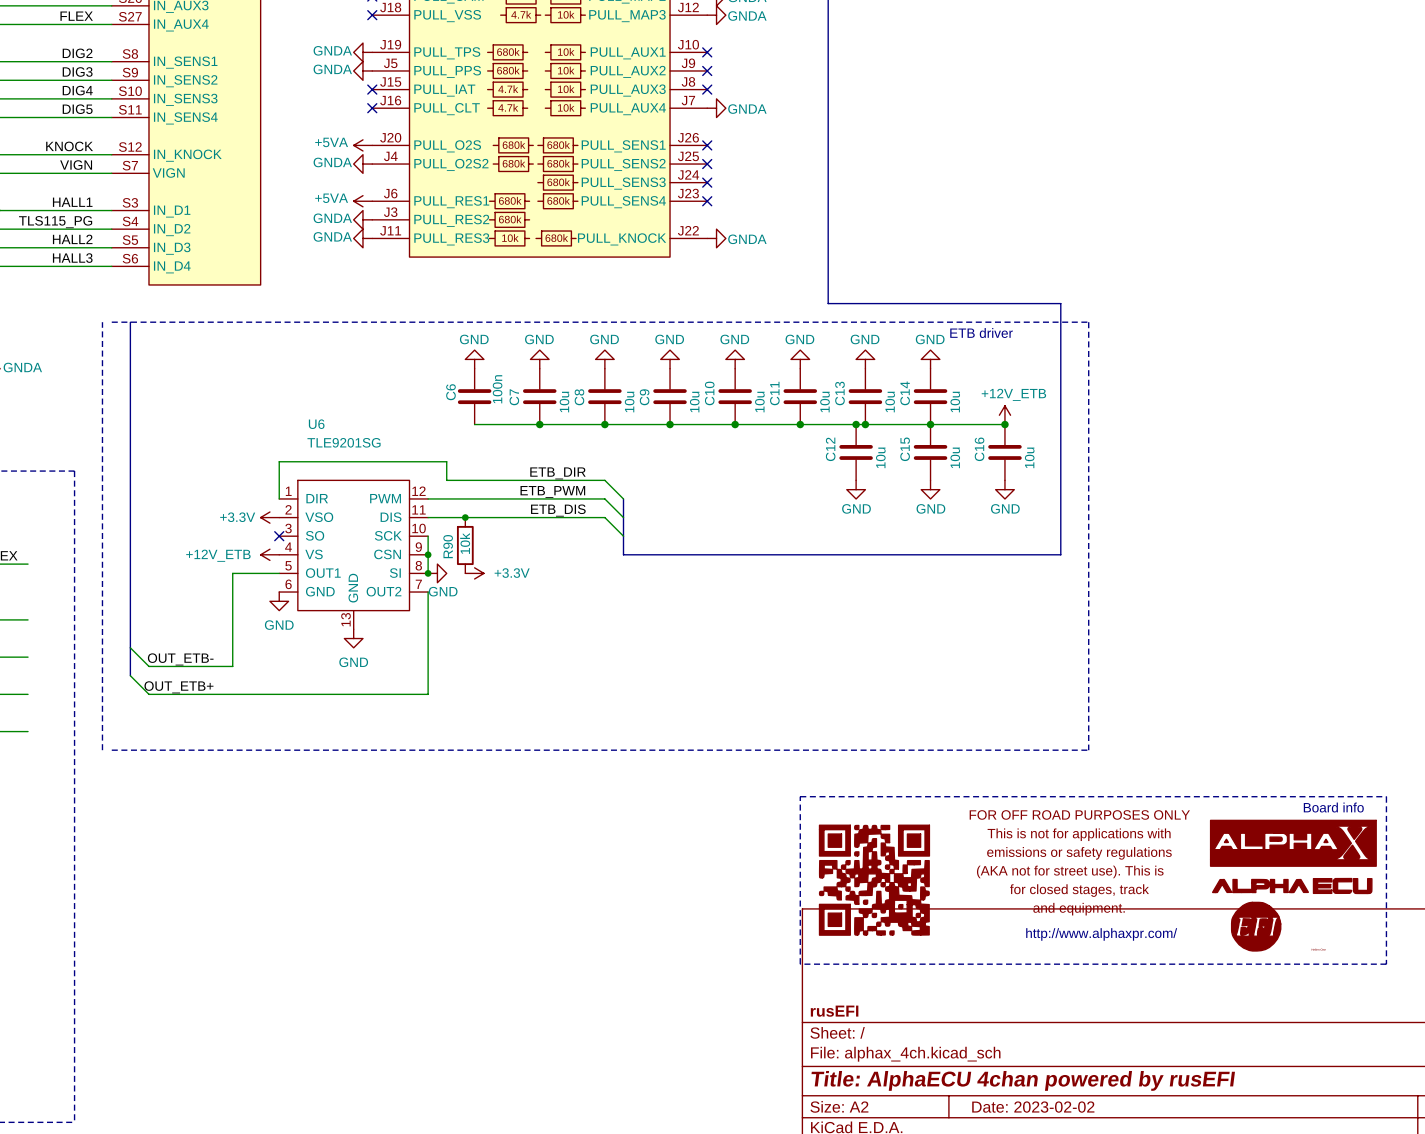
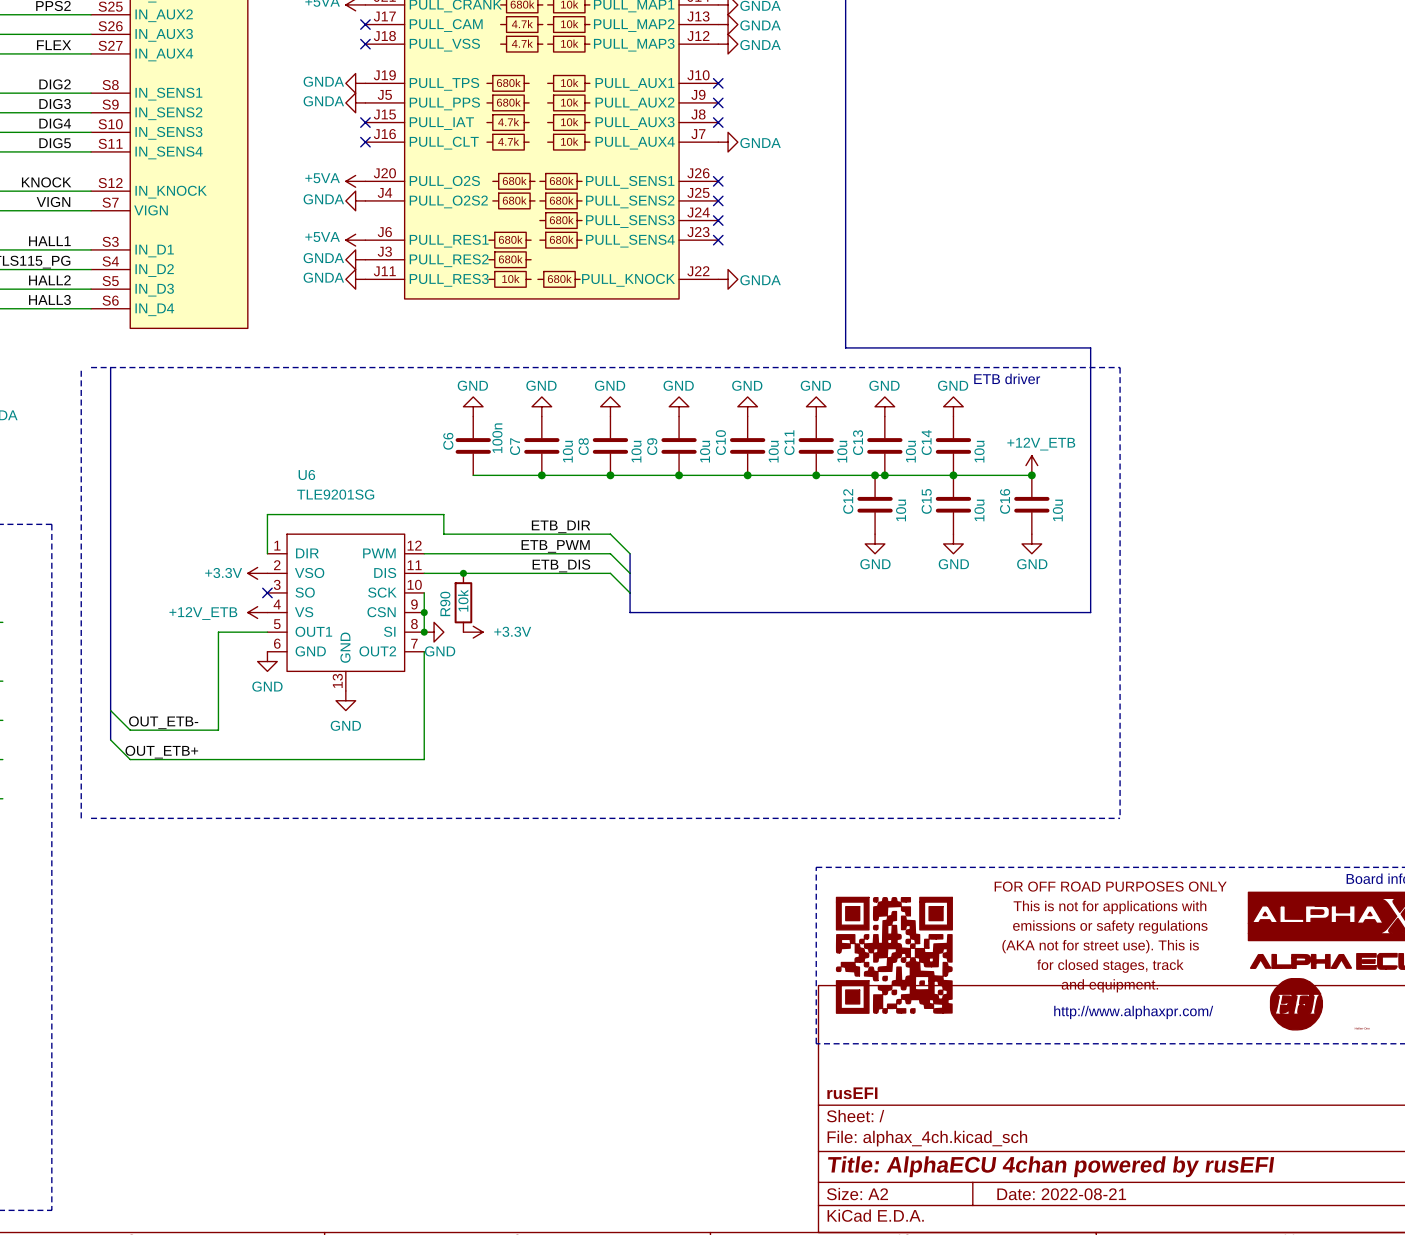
title block: Date: 2023-02-02 (1033, 1107) -> Date: 2022-08-21 (1061, 1194)

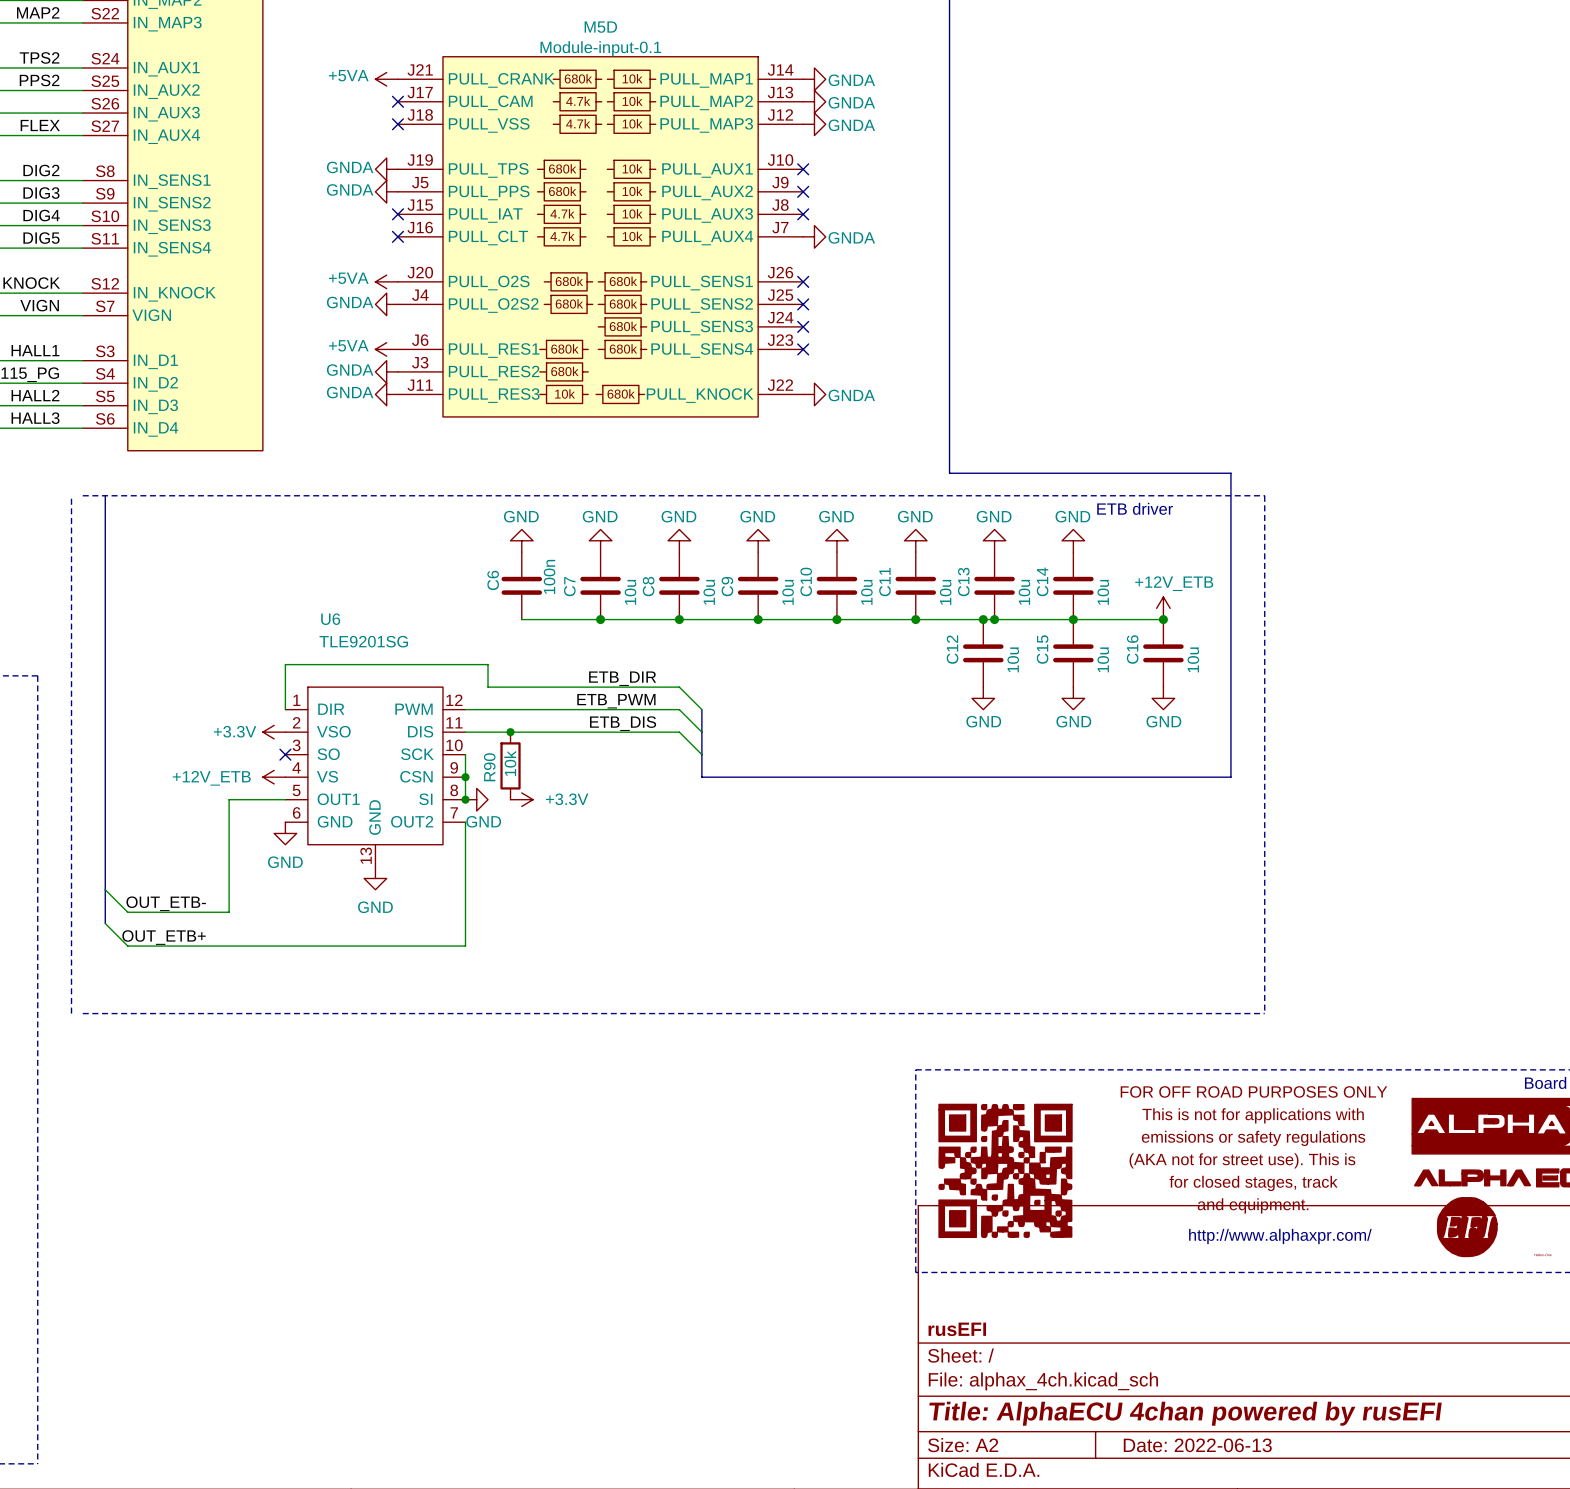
title block: Date: 2022-08-21 (1061, 1194) -> Date: 2022-06-13 (1197, 1445)

